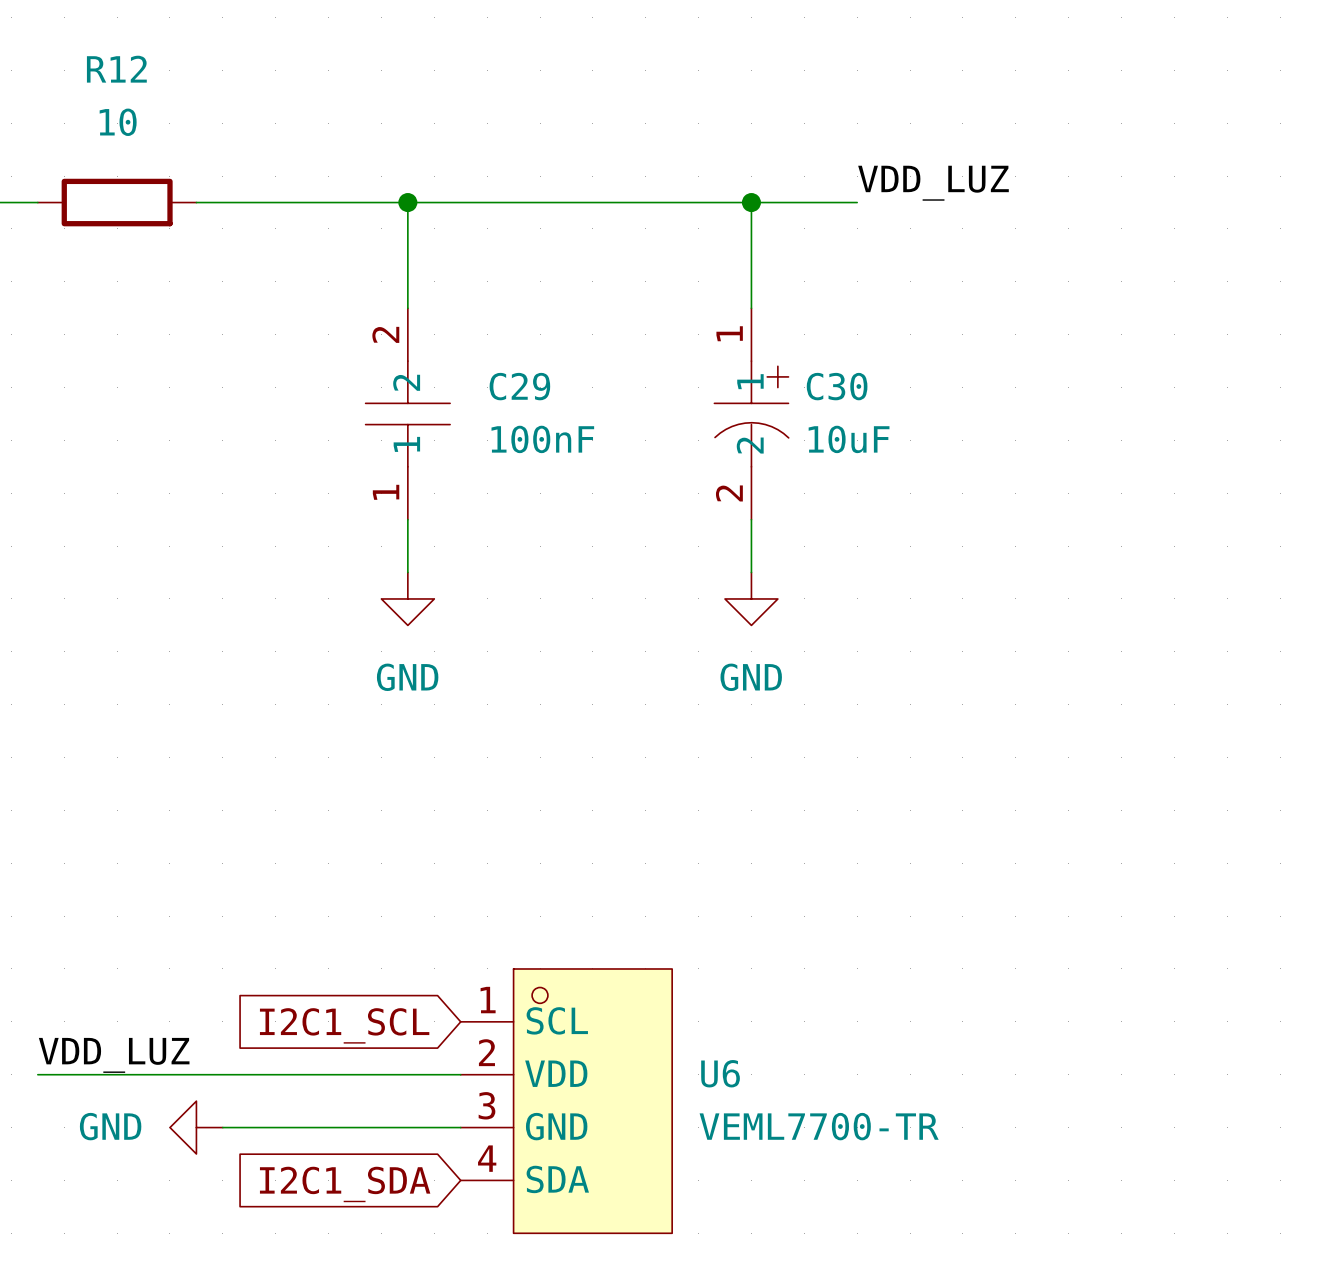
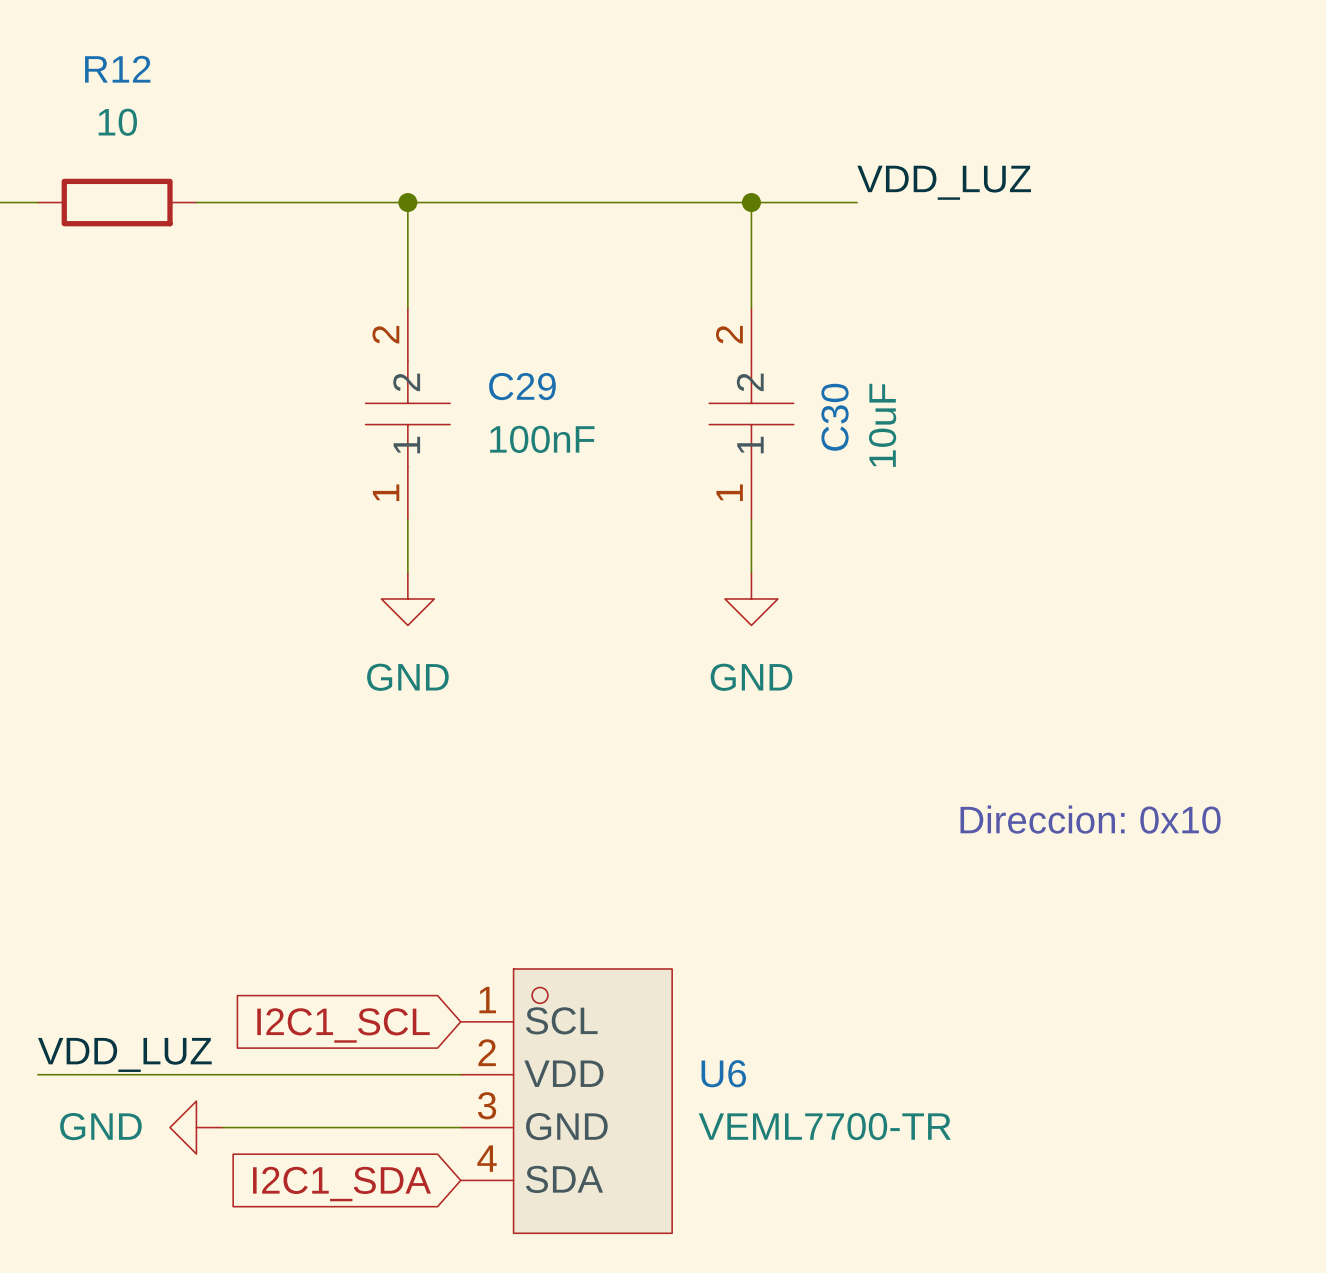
C30 symbol: [714, 308, 789, 520] -> [709, 308, 794, 520]
C30 name position: C30 (837, 386) -> C30 (835, 417)
text: none -> Direccion: 0x10 (1090, 819)

